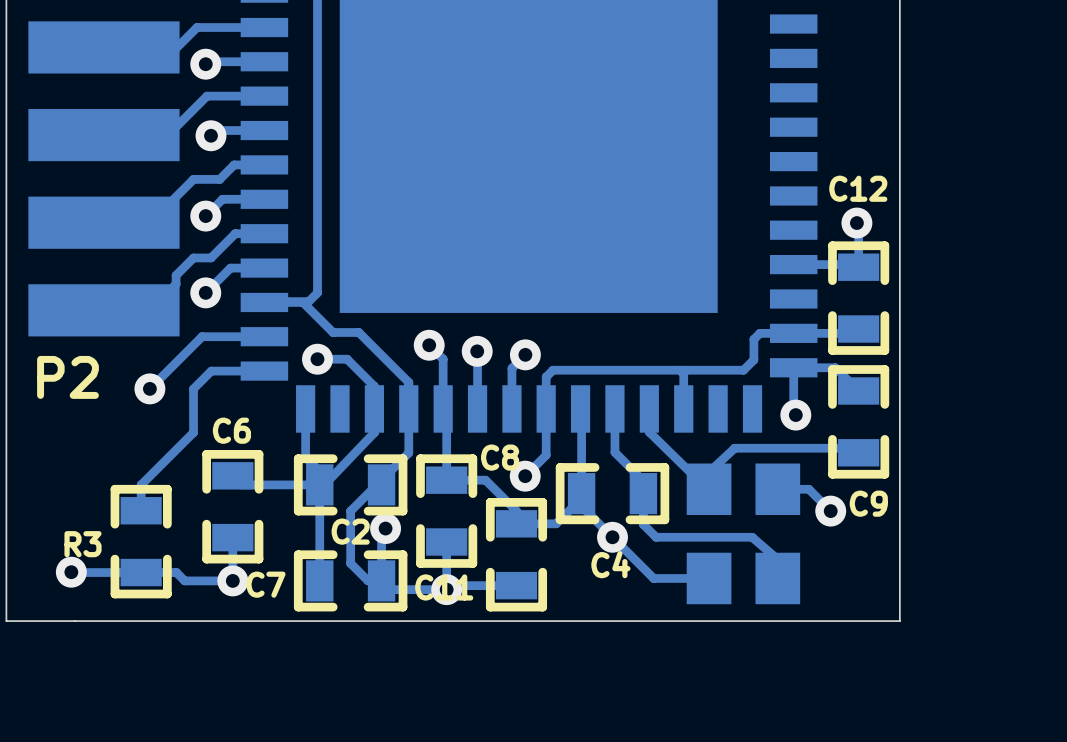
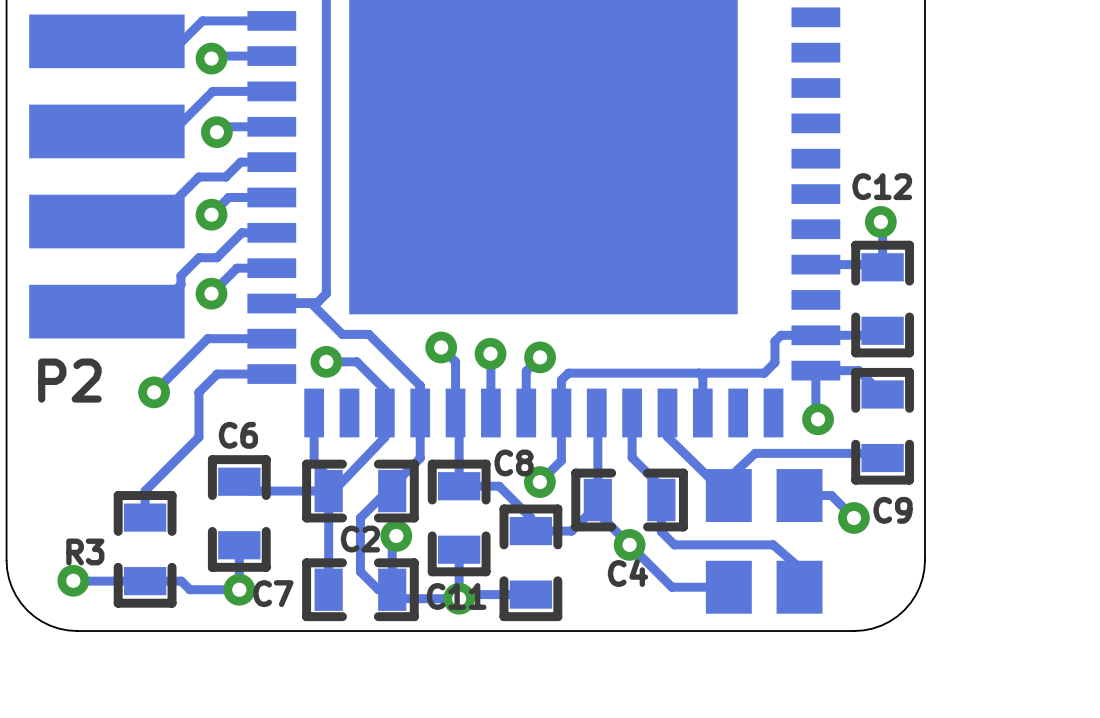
board edge: (6, 552) (6, 621) (75, 621) -> (6, 560) (11, 587) (27, 610) (50, 625) (77, 631)
board edge: (899, 552) (899, 621) (831, 621) -> (924, 560) (919, 587) (904, 610) (881, 625) (854, 631)

